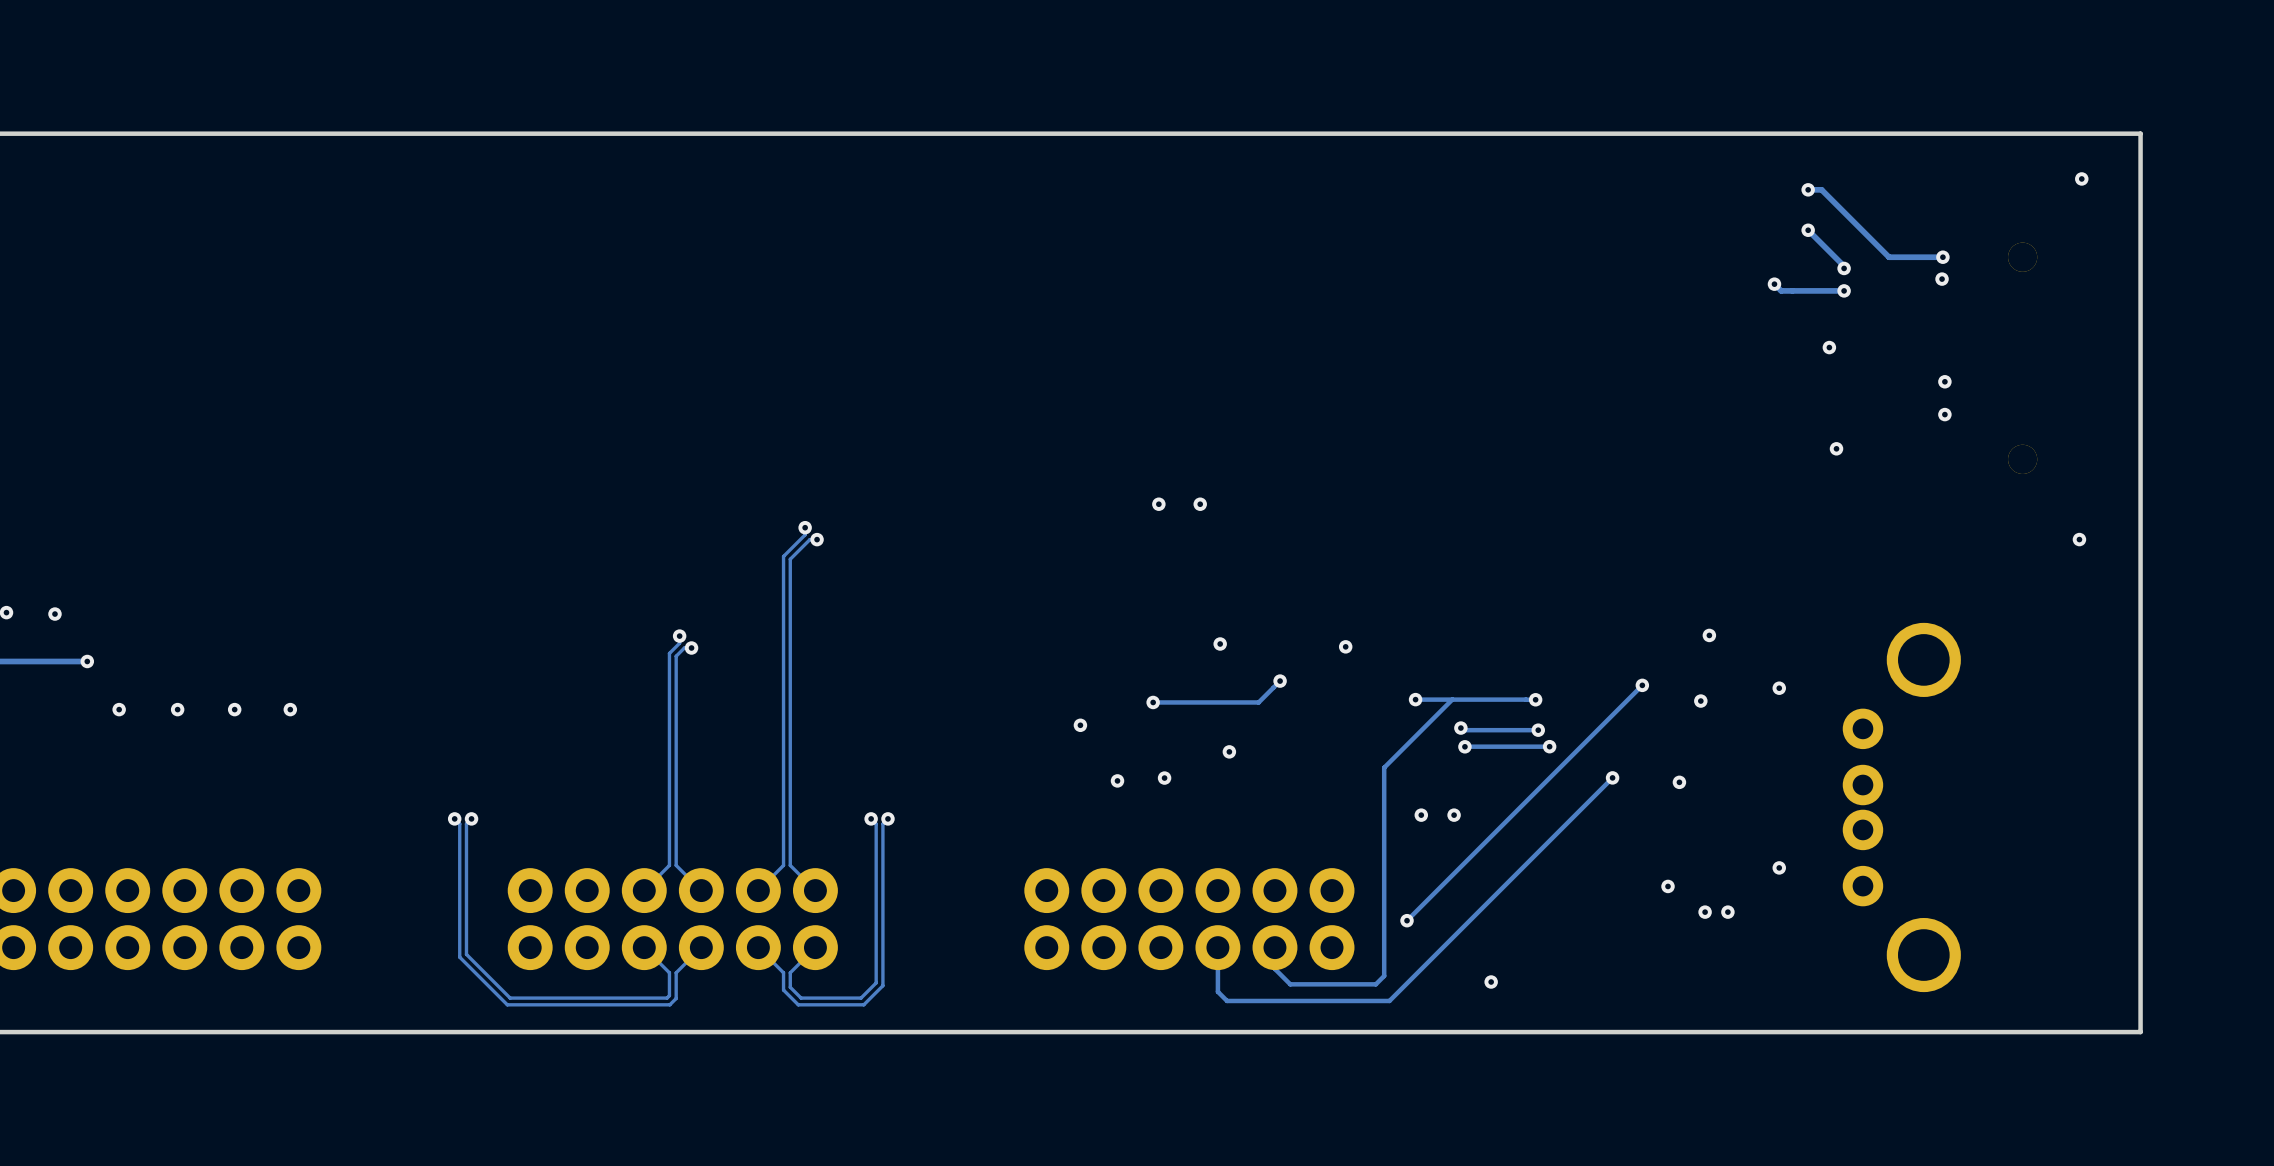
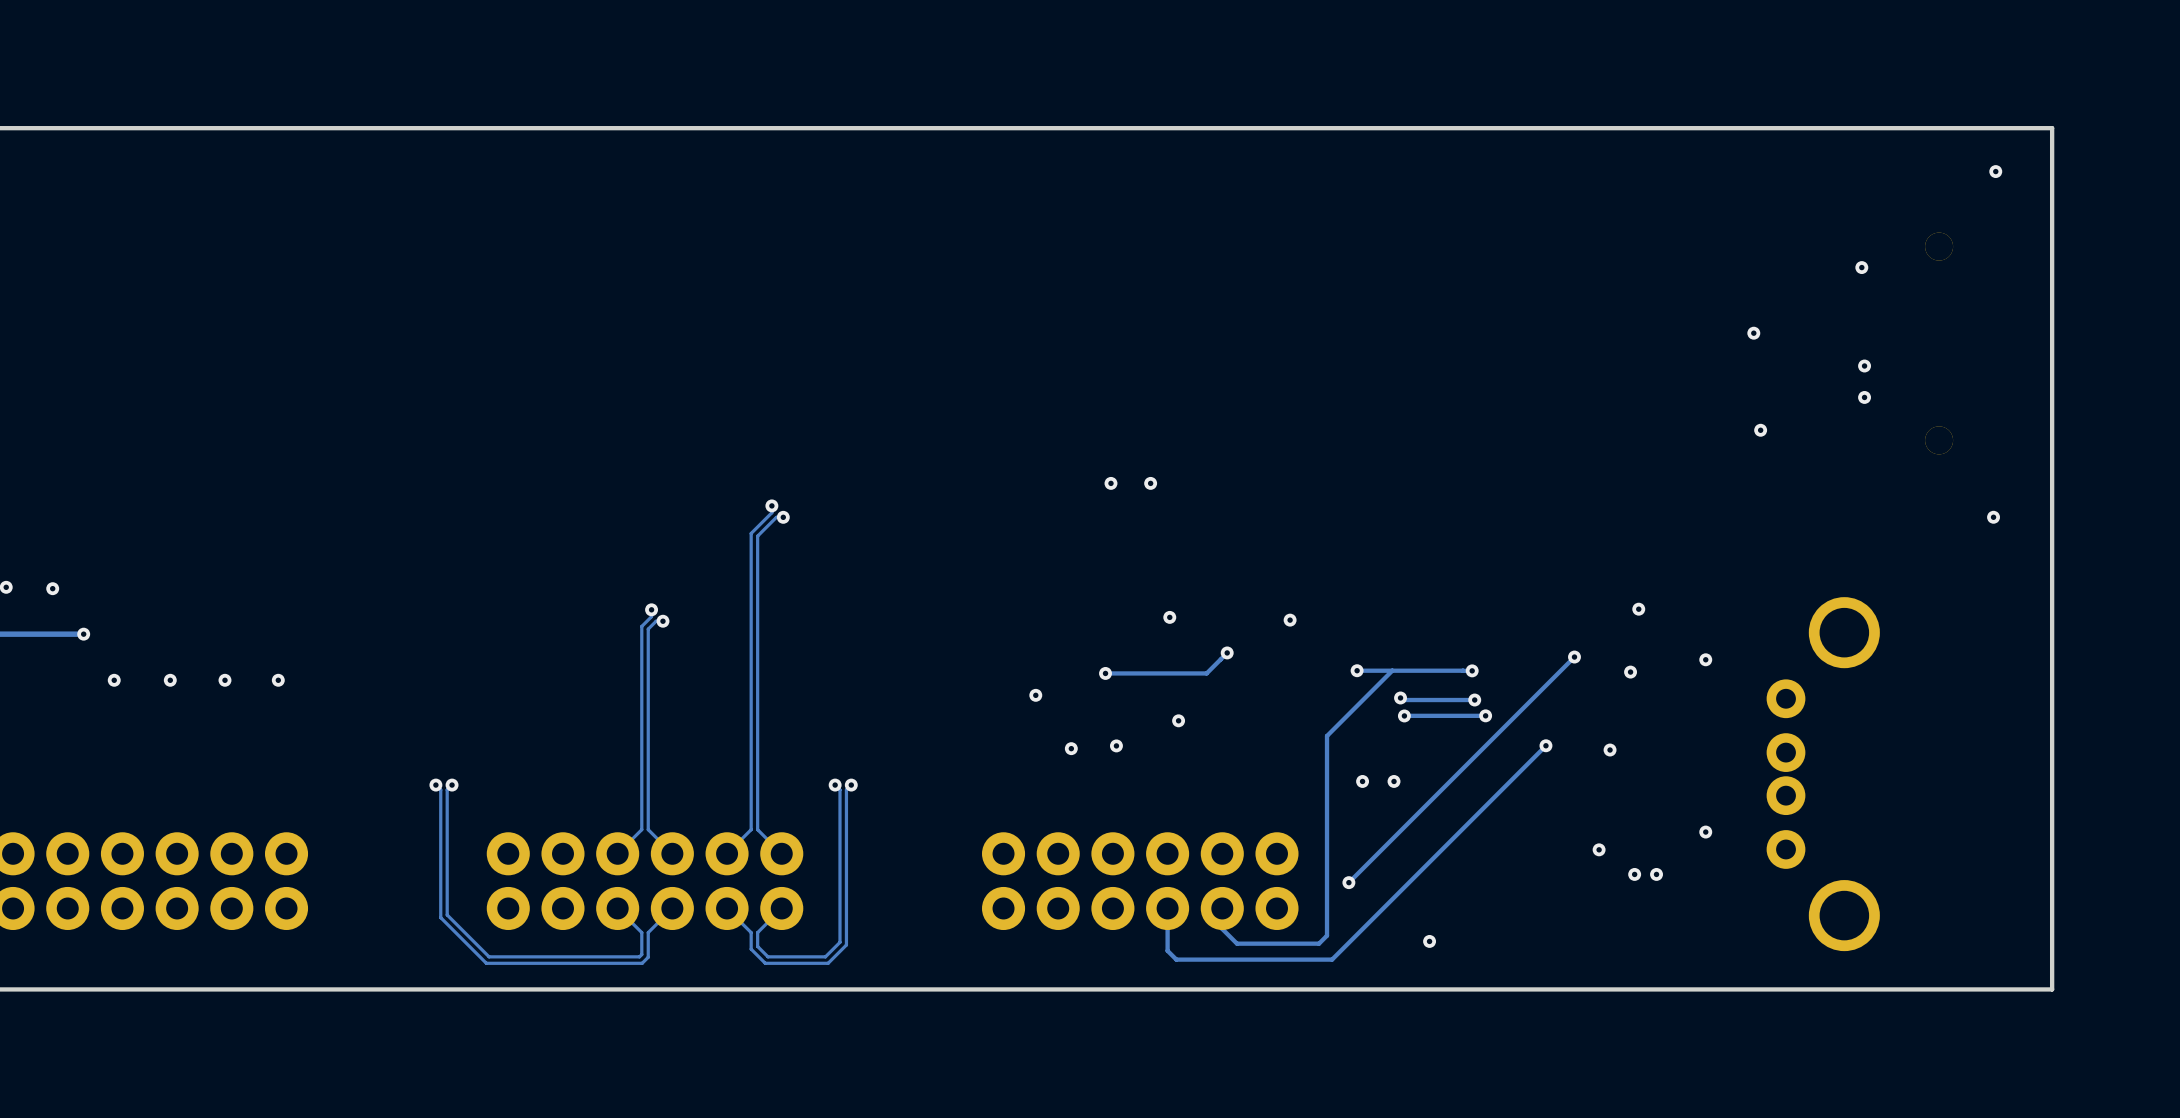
track: (1808, 189) (1821, 189) (1889, 257) (1942, 257) -> none
via: (1808, 189) -> none
track: (1808, 230) (1844, 266) (1844, 268) -> none
via: (1808, 230) -> none
via: (1942, 257) -> none
via: (1844, 268) -> none
track: (1774, 284) (1781, 290) (1844, 290) -> none
via: (1774, 284) -> none
via: (1844, 290) -> none

